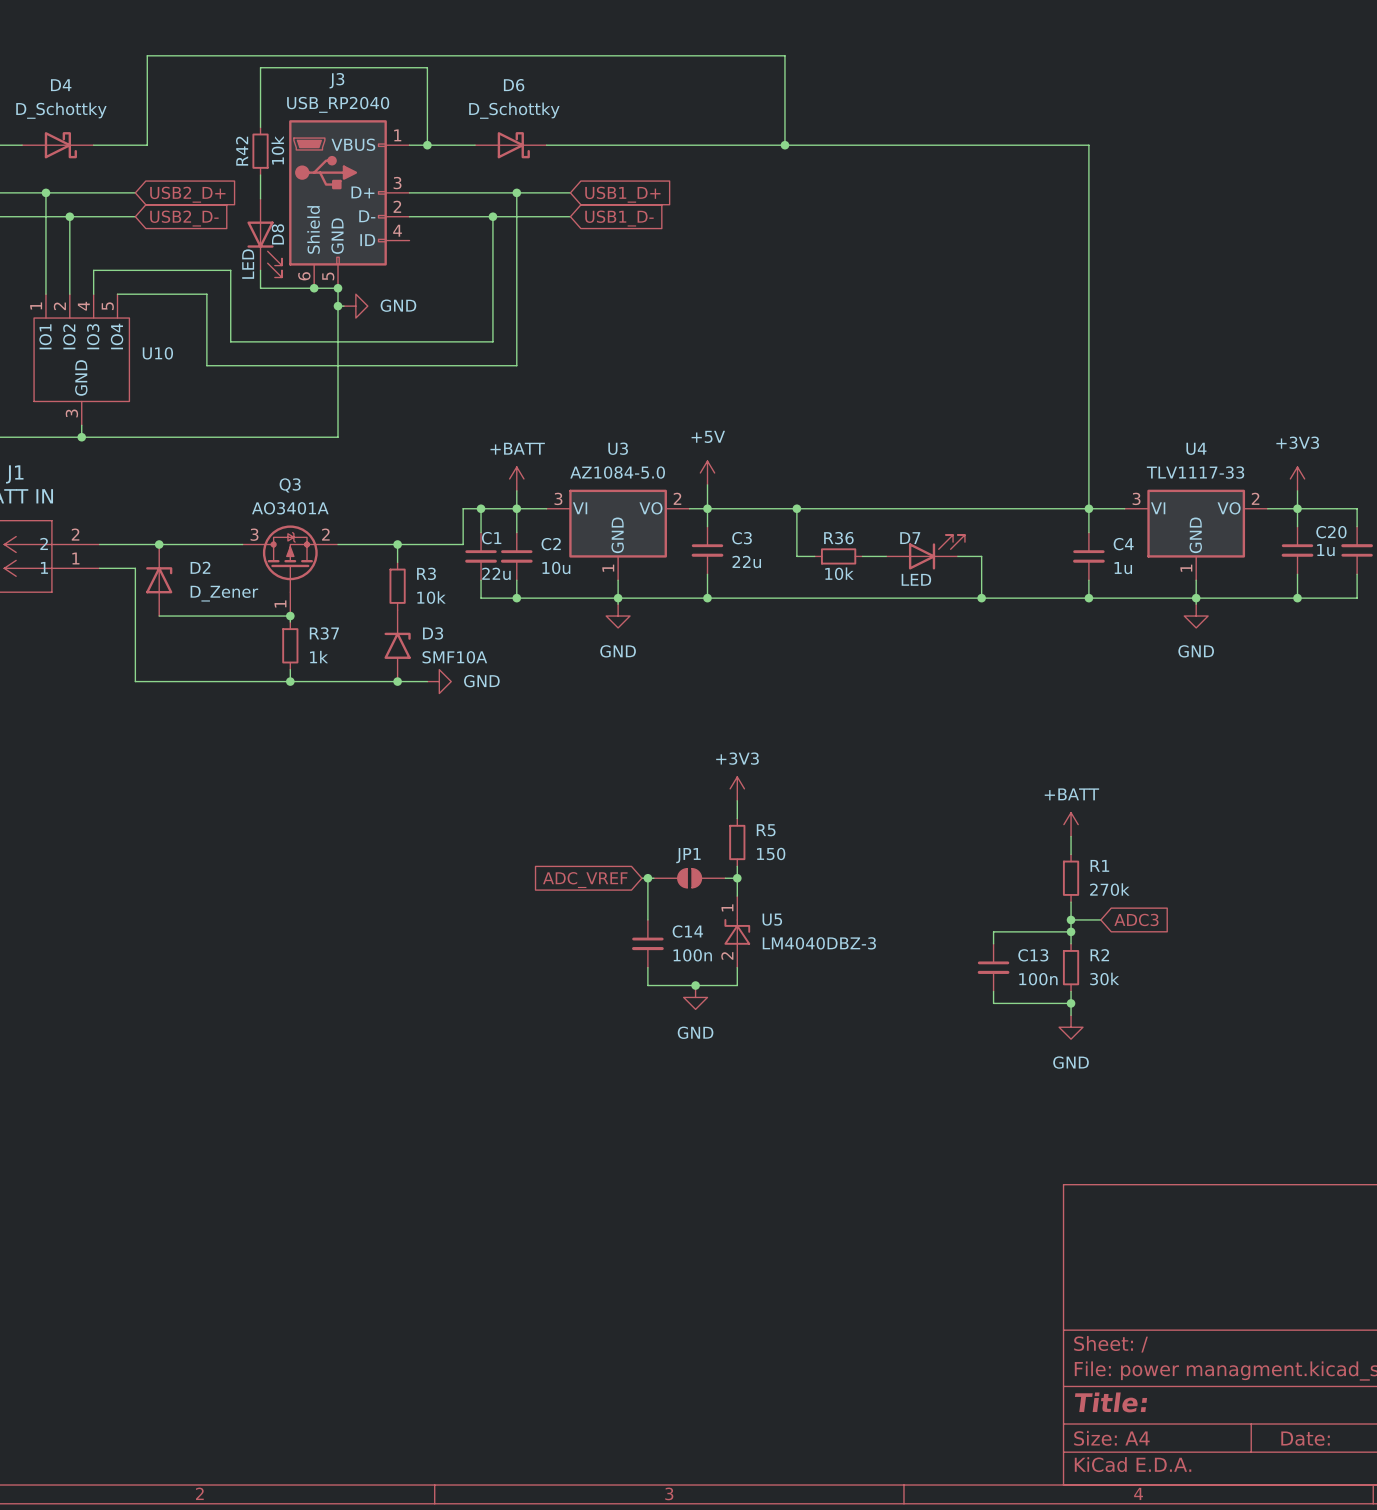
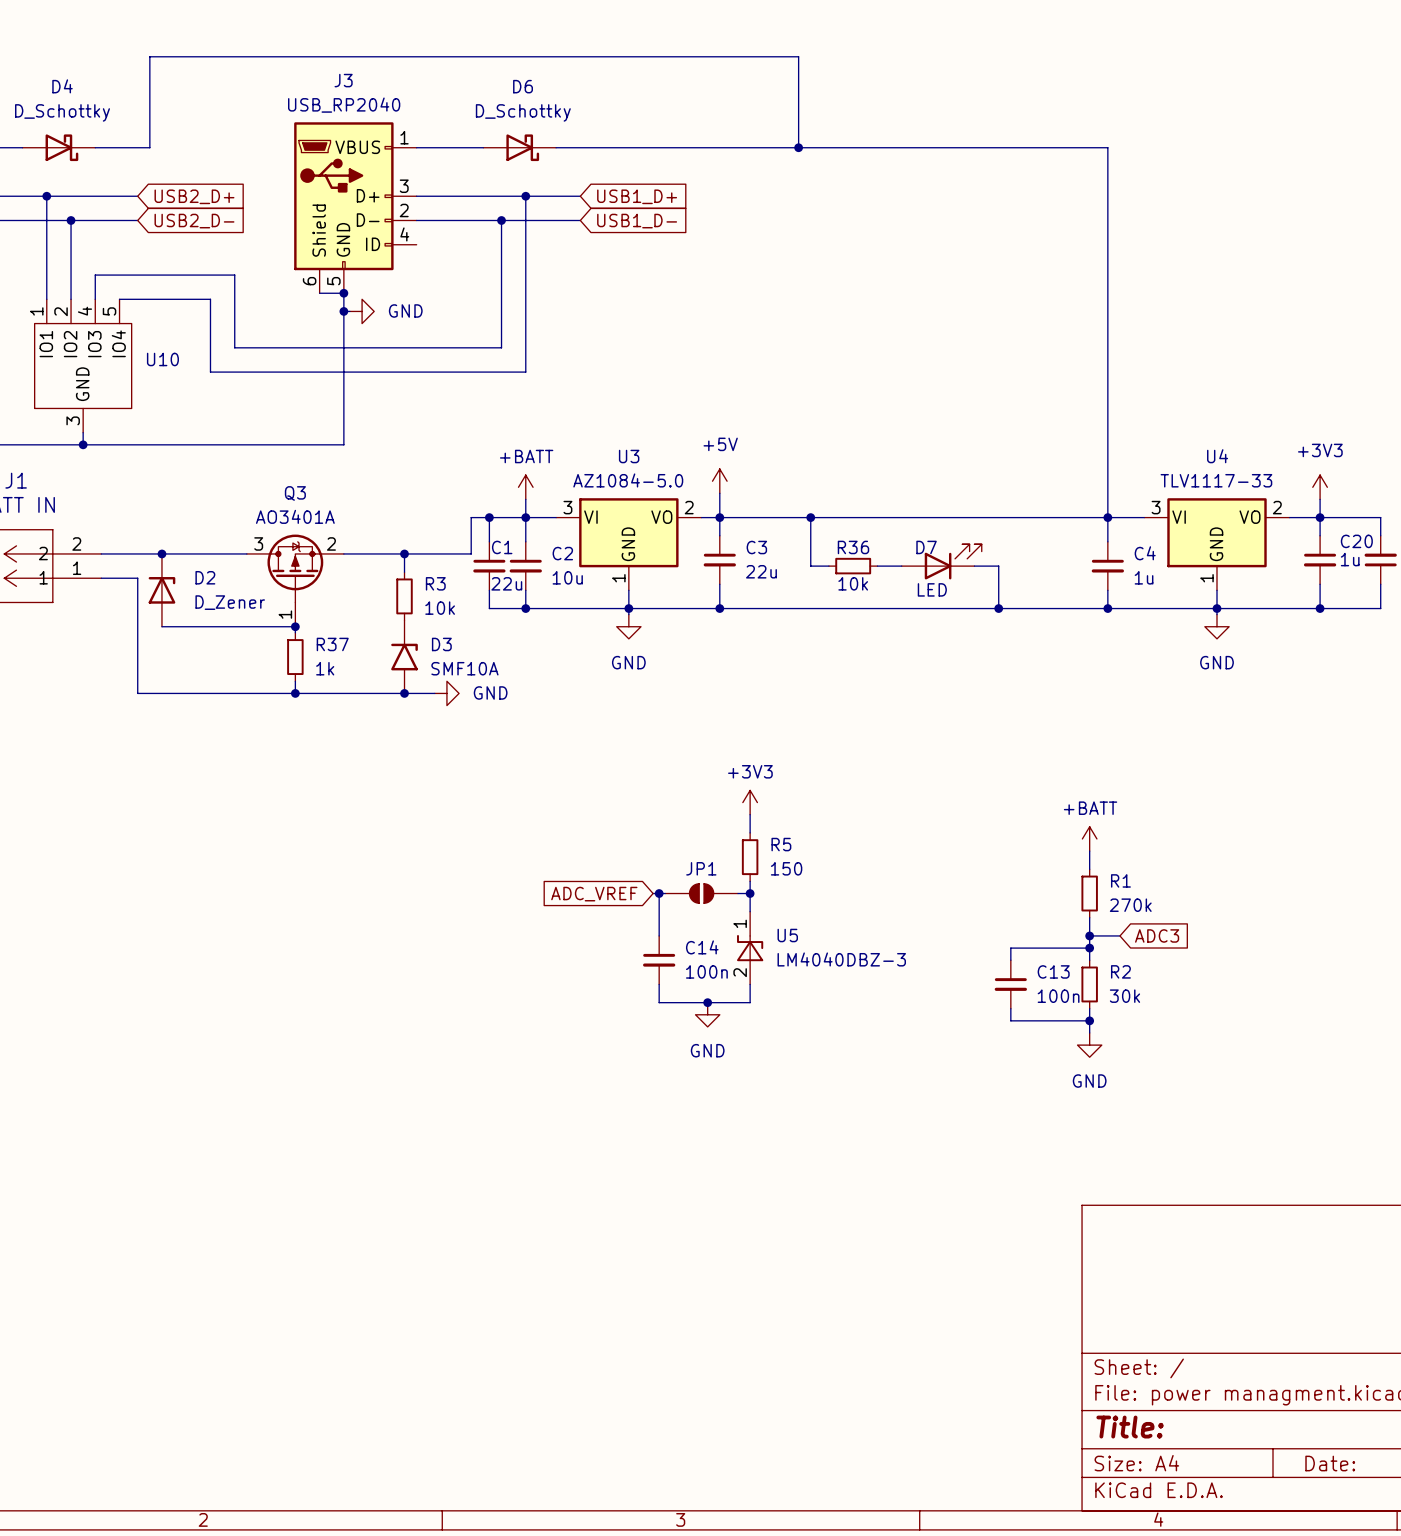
wire: (260, 127) (260, 67) (427, 67) (427, 145) -> none
junction: (427, 145) -> none
R42: 10k (260, 151) -> none
wire: (260, 175) (260, 198) -> none
D8: LED (264, 238) -> none
wire: (260, 270) (260, 288) (314, 288) -> none
junction: (314, 288) -> none

